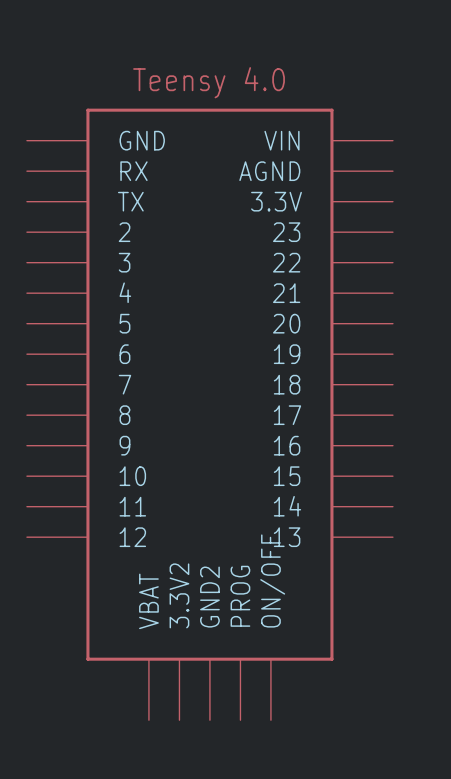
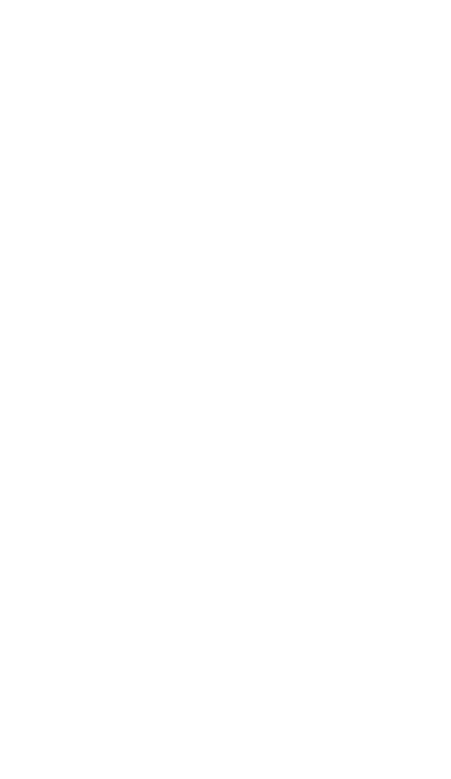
part: (209, 414) -> none

